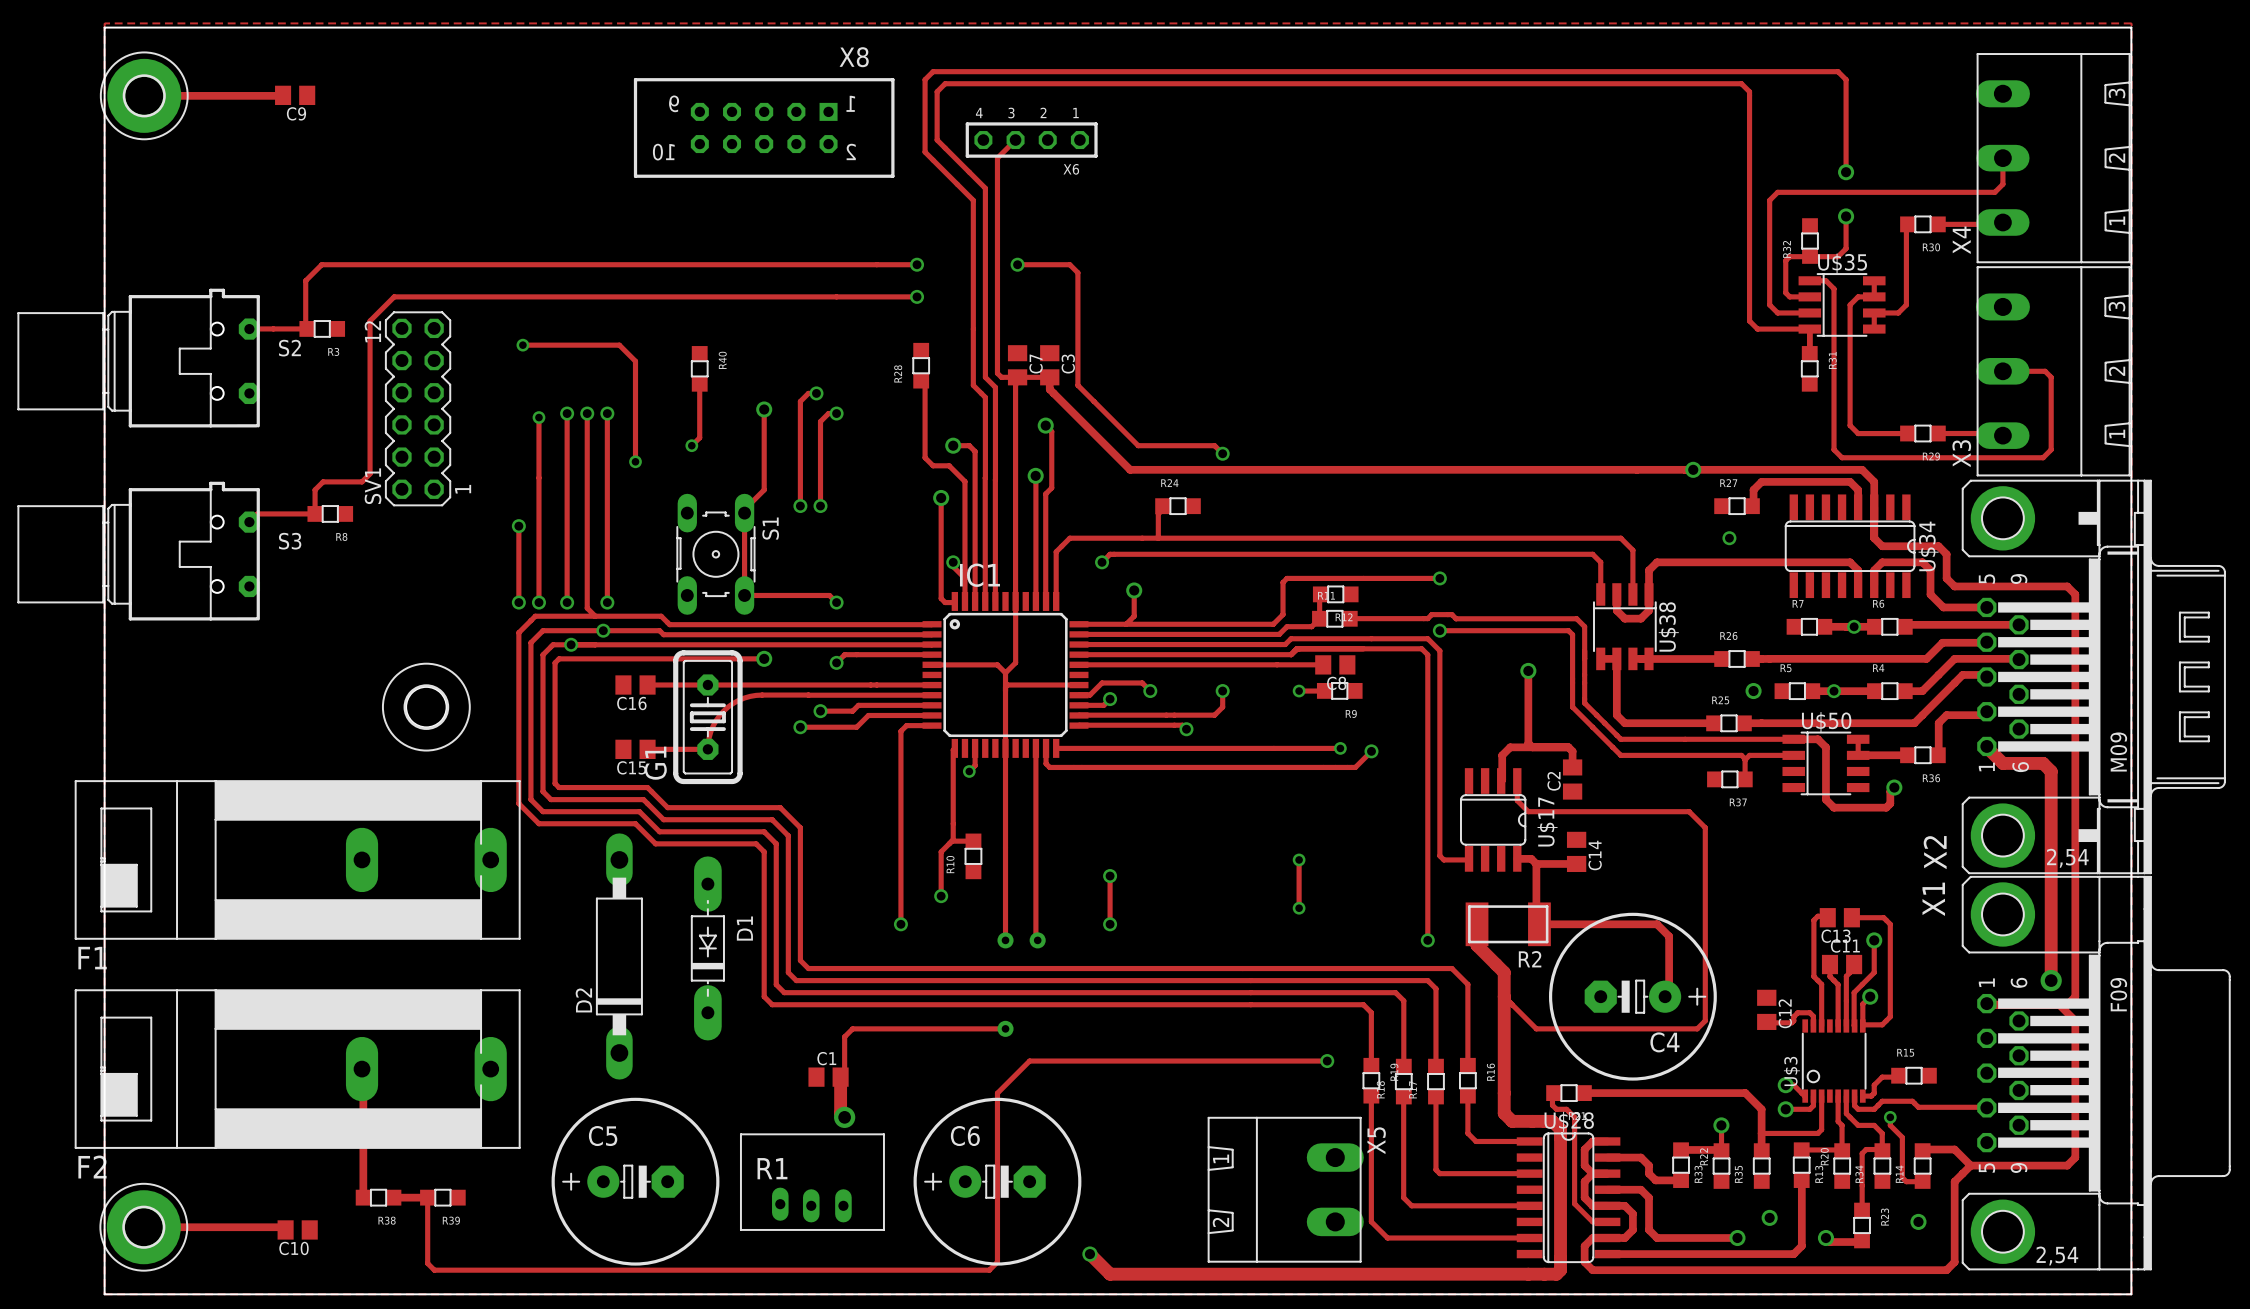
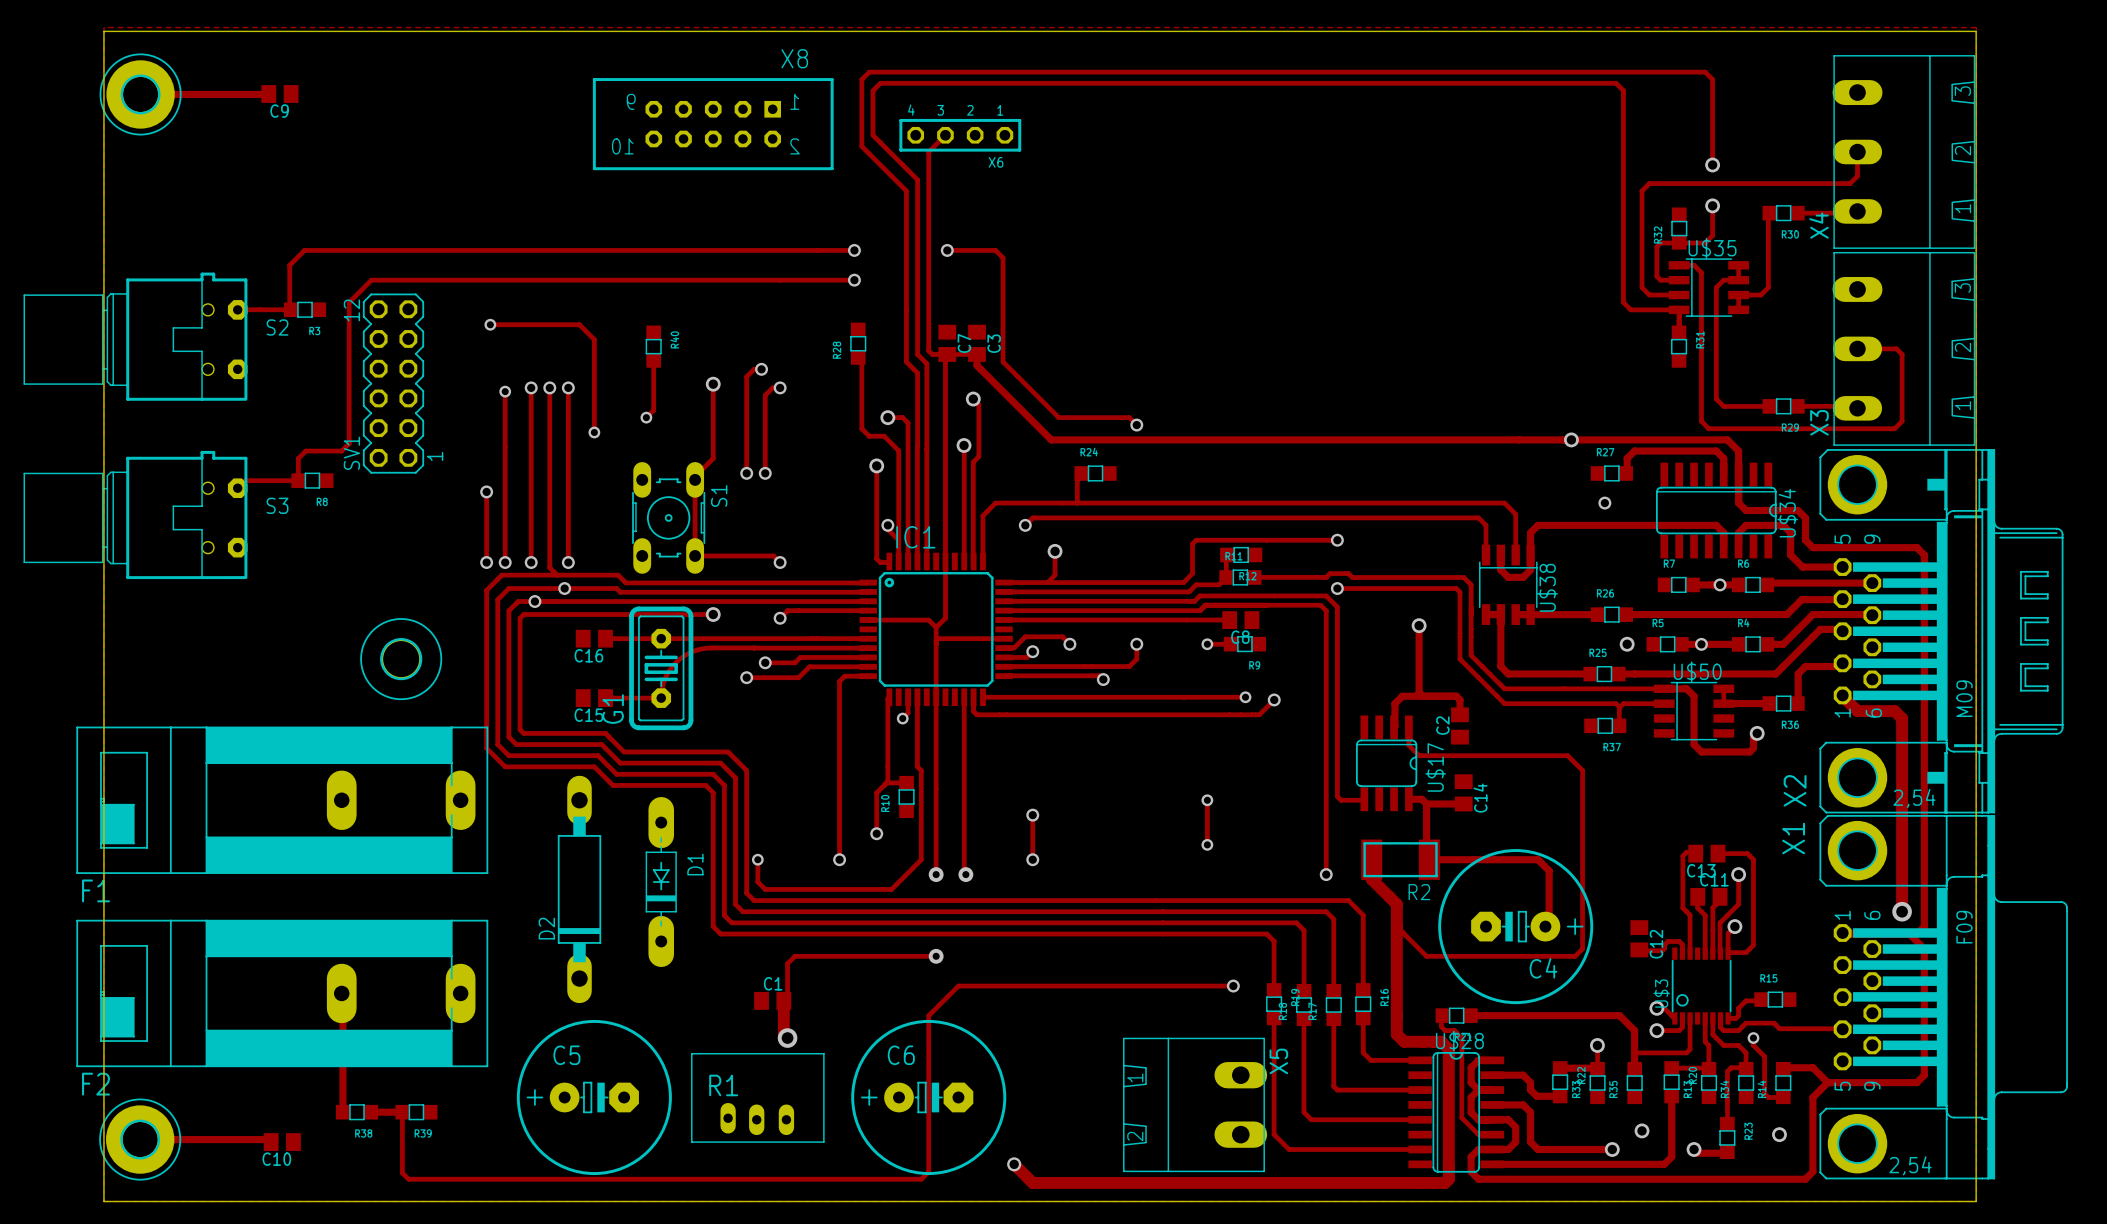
track: none -> (917, 697) (917, 766) (921, 770) (921, 859) (891, 889) (765, 889) (757, 882) (757, 859)
via: none -> (757, 859)

